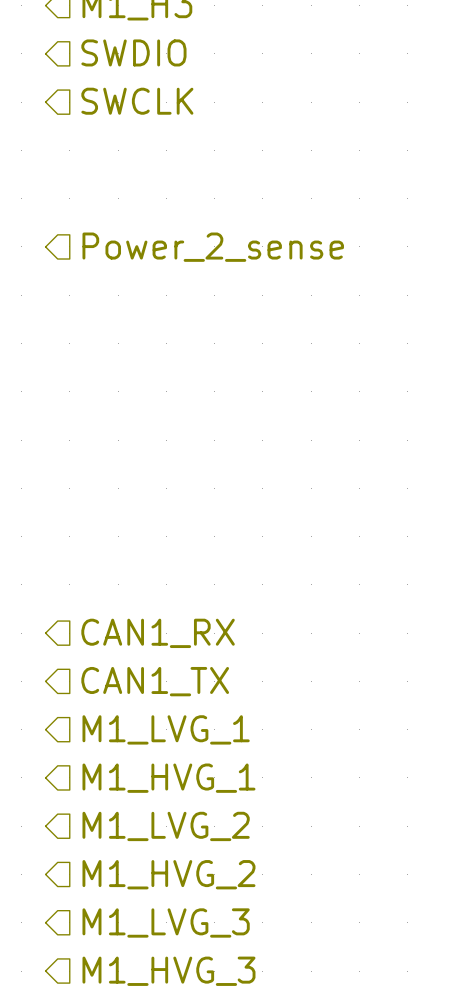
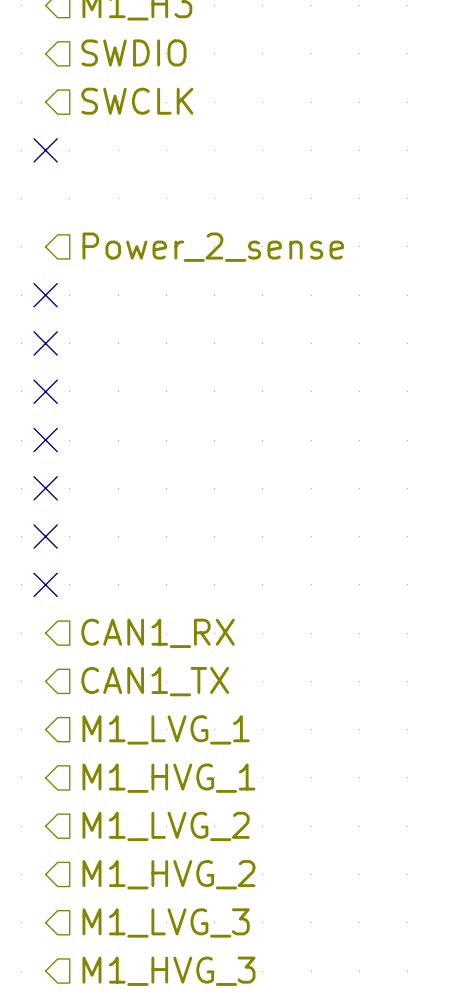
no-connect mark: none -> (45, 150)
no-connect mark: none -> (45, 295)
no-connect mark: none -> (45, 343)
no-connect mark: none -> (45, 391)
no-connect mark: none -> (45, 440)
no-connect mark: none -> (45, 488)
no-connect mark: none -> (45, 536)
no-connect mark: none -> (45, 584)

